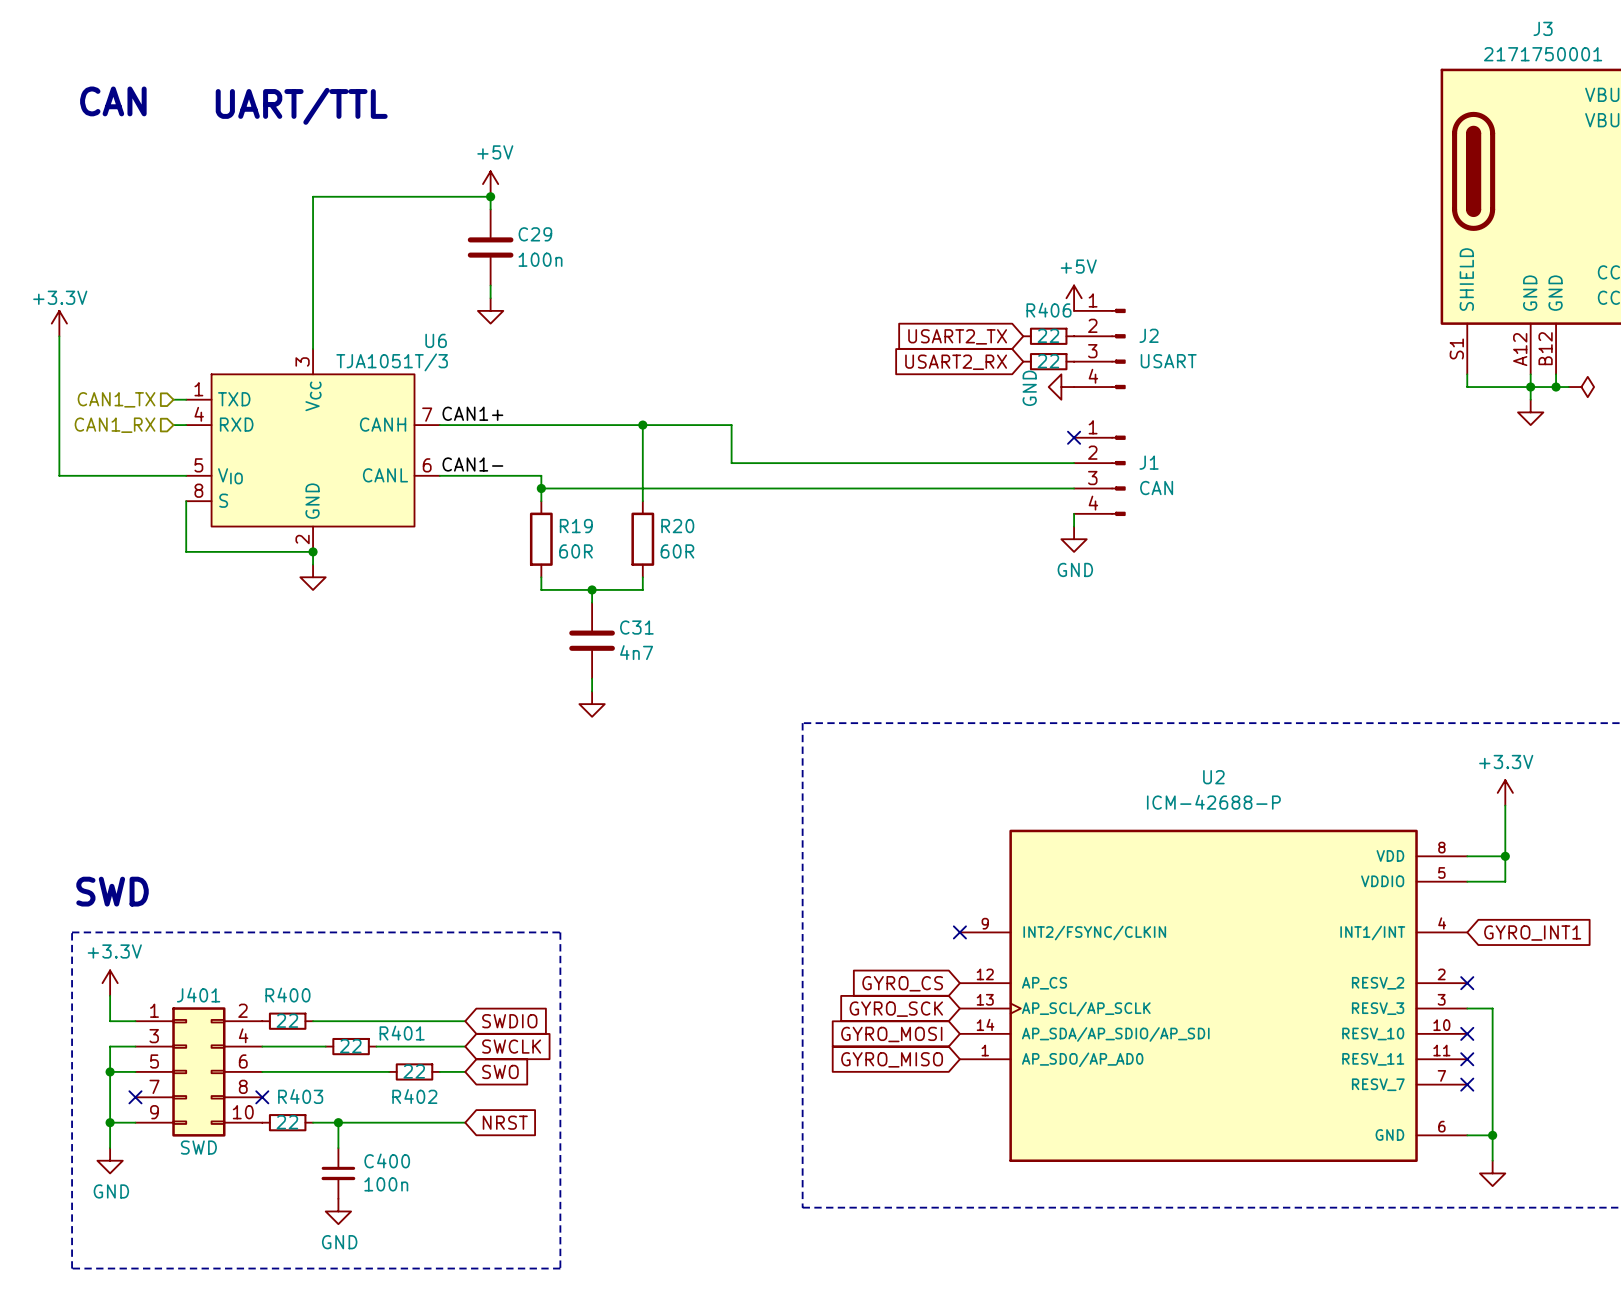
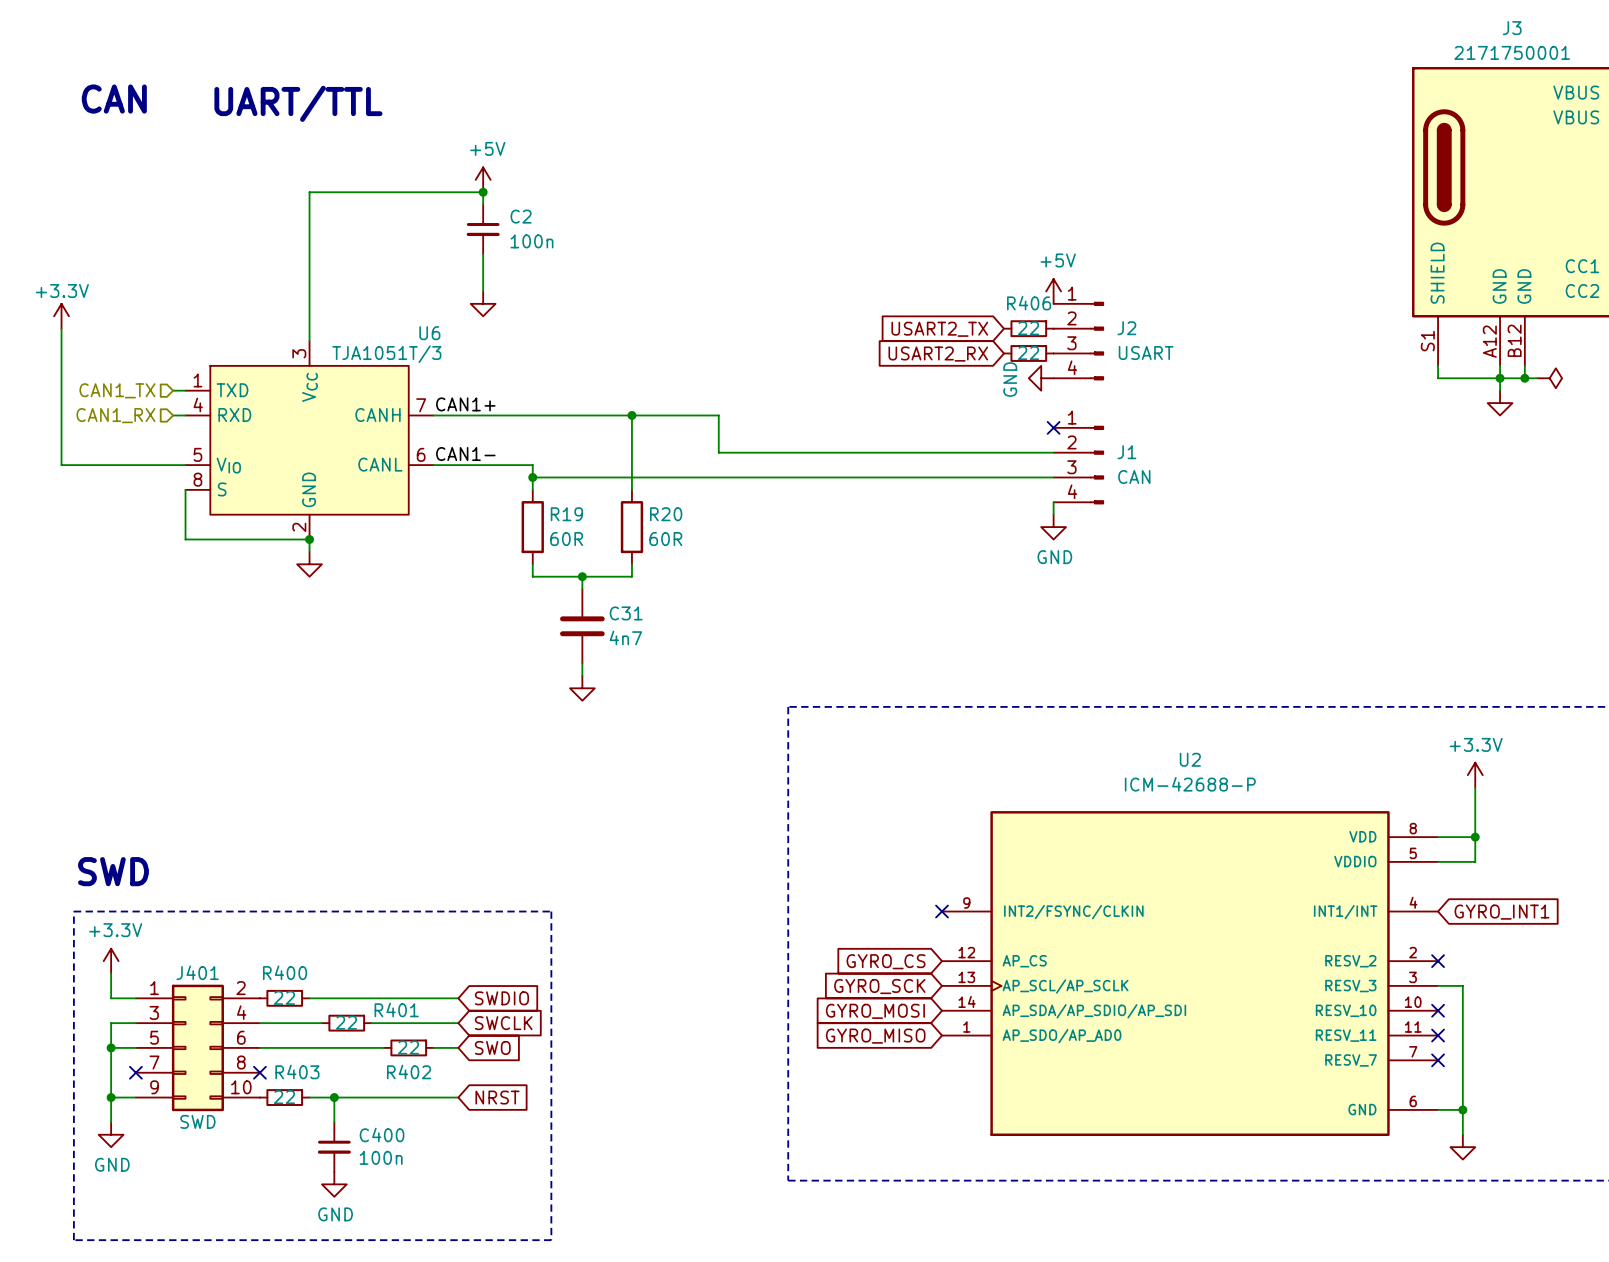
C2: none -> 100n (483, 229)
C29: 100n (490, 247) -> none

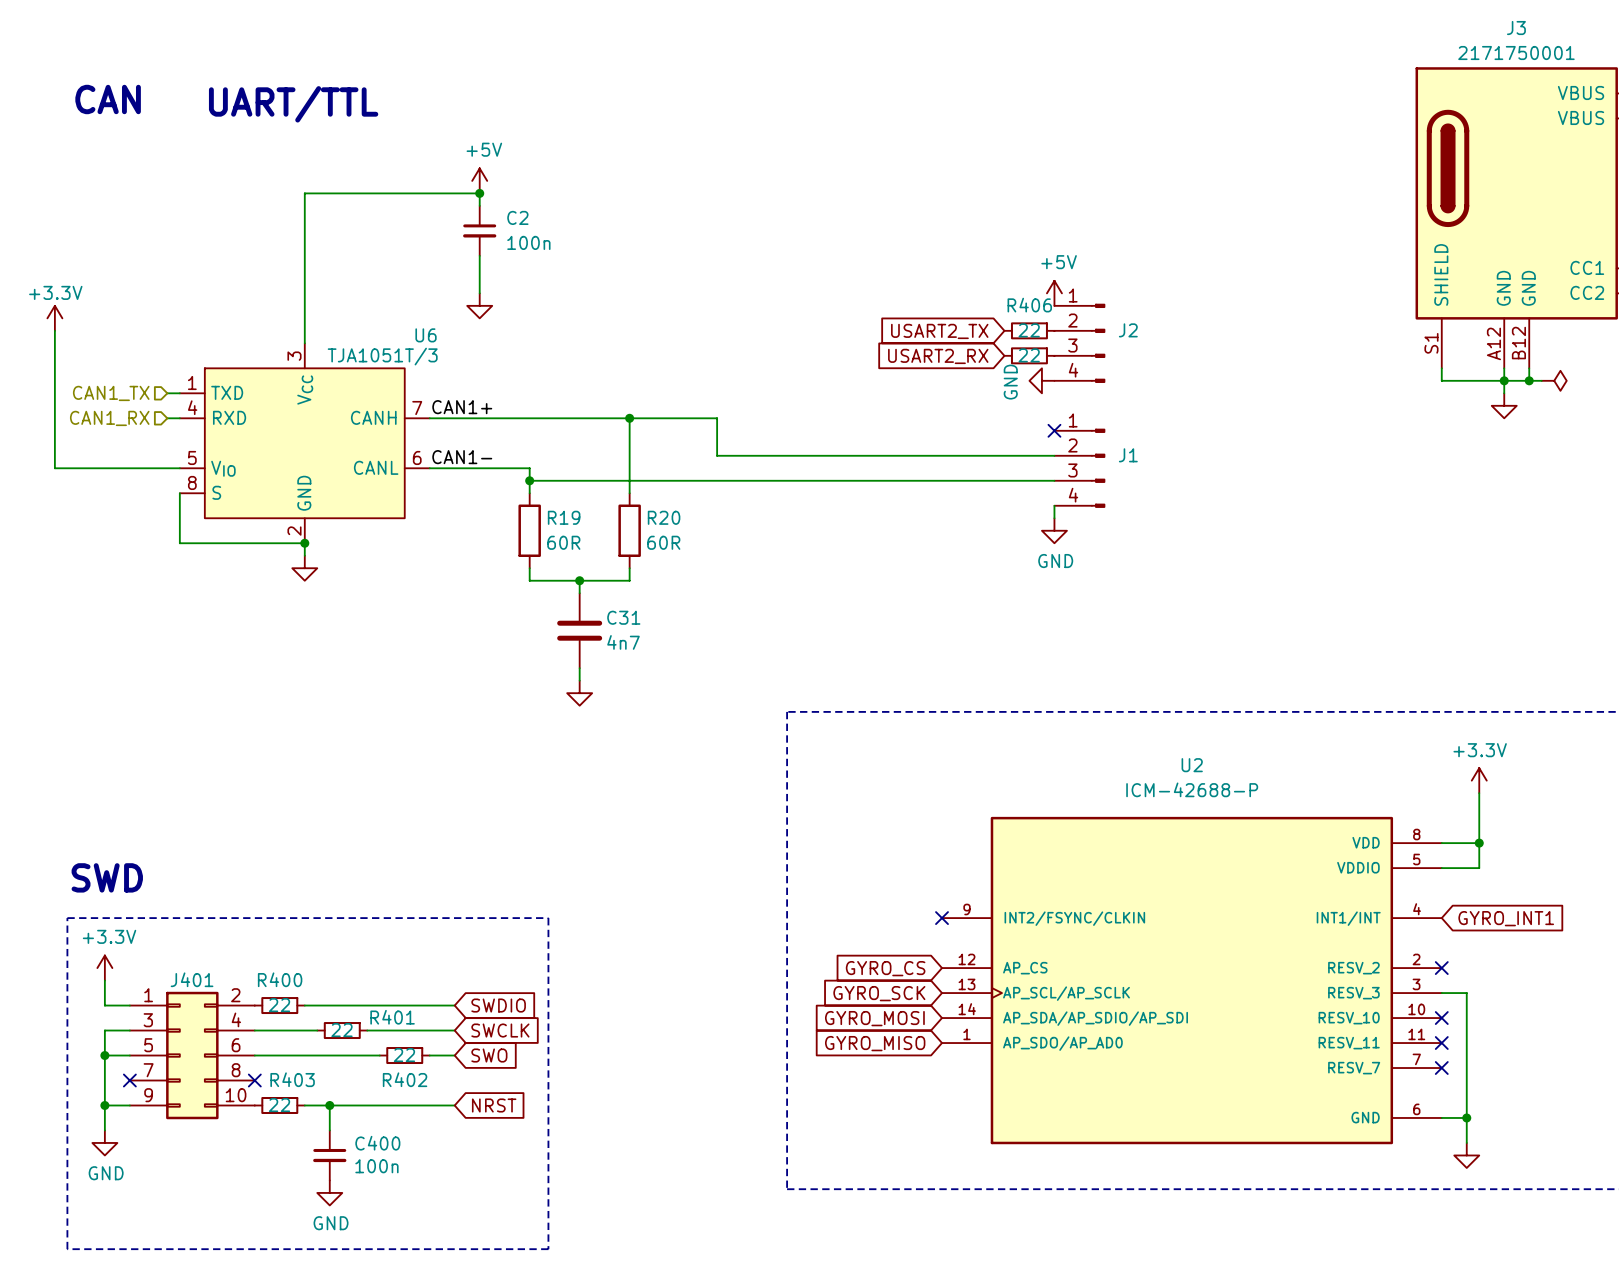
J2 value: USART (1146, 353) -> none
J1 value: CAN (1134, 477) -> none
J401 value: SWD (197, 1121) -> none

